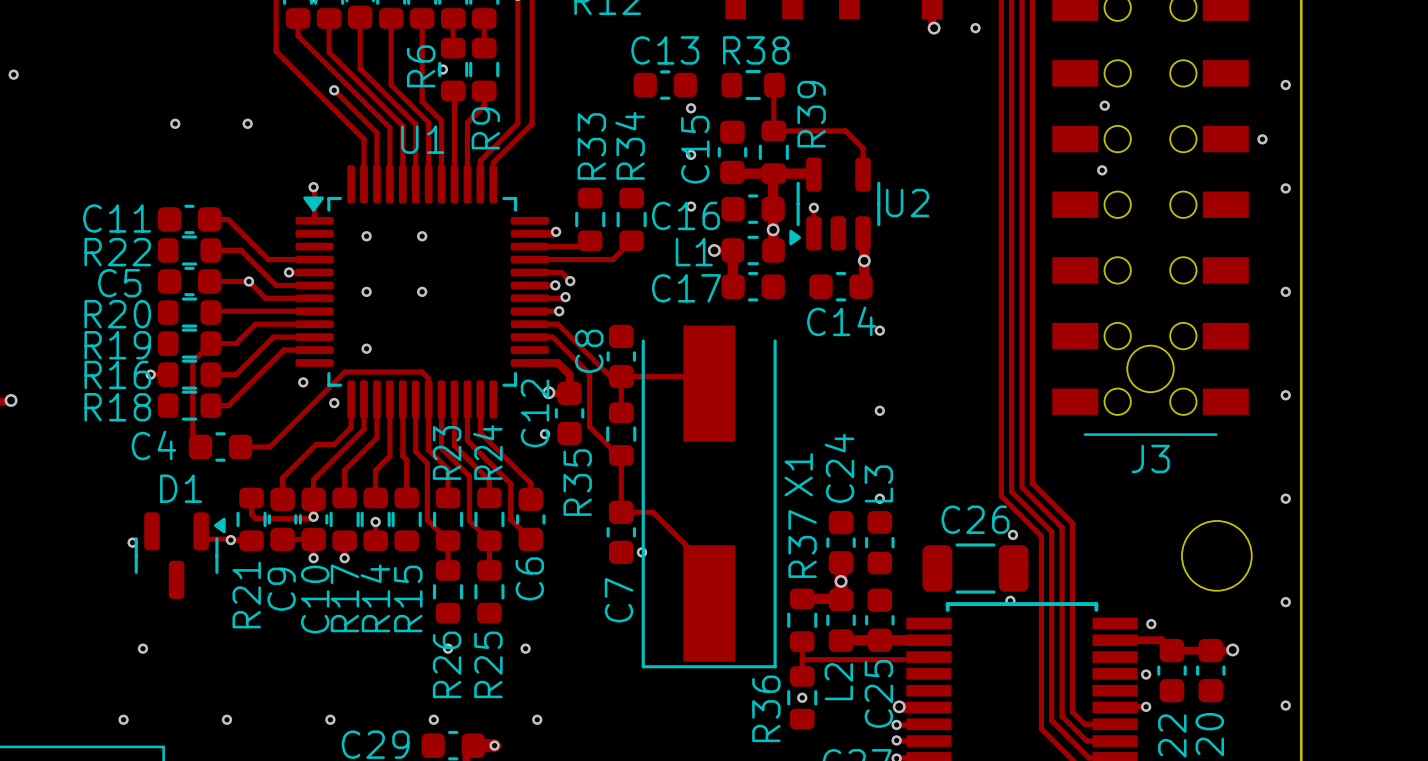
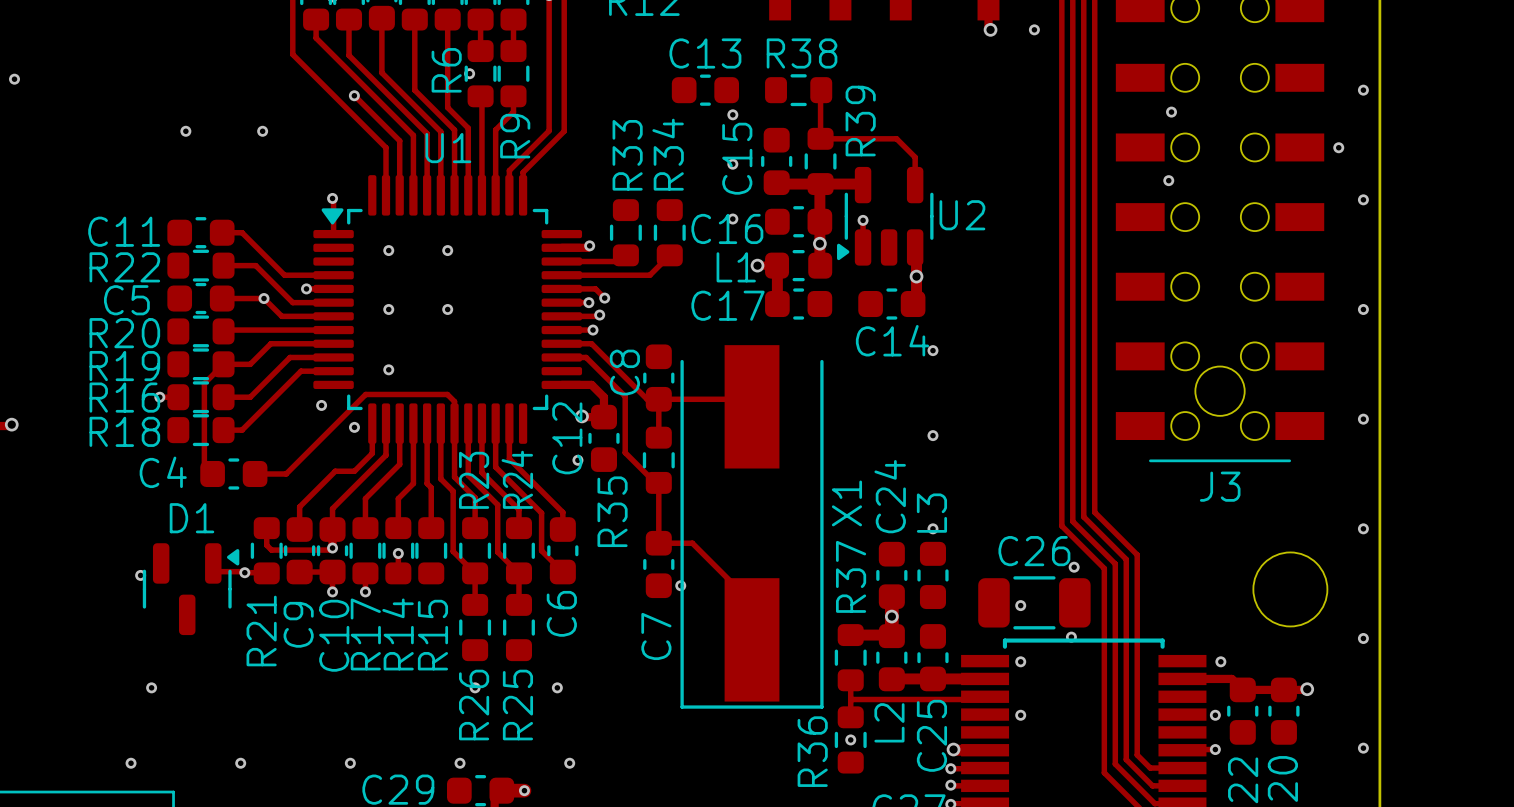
via: none -> (1020, 605)
via: none -> (1020, 661)
via: none -> (1020, 715)

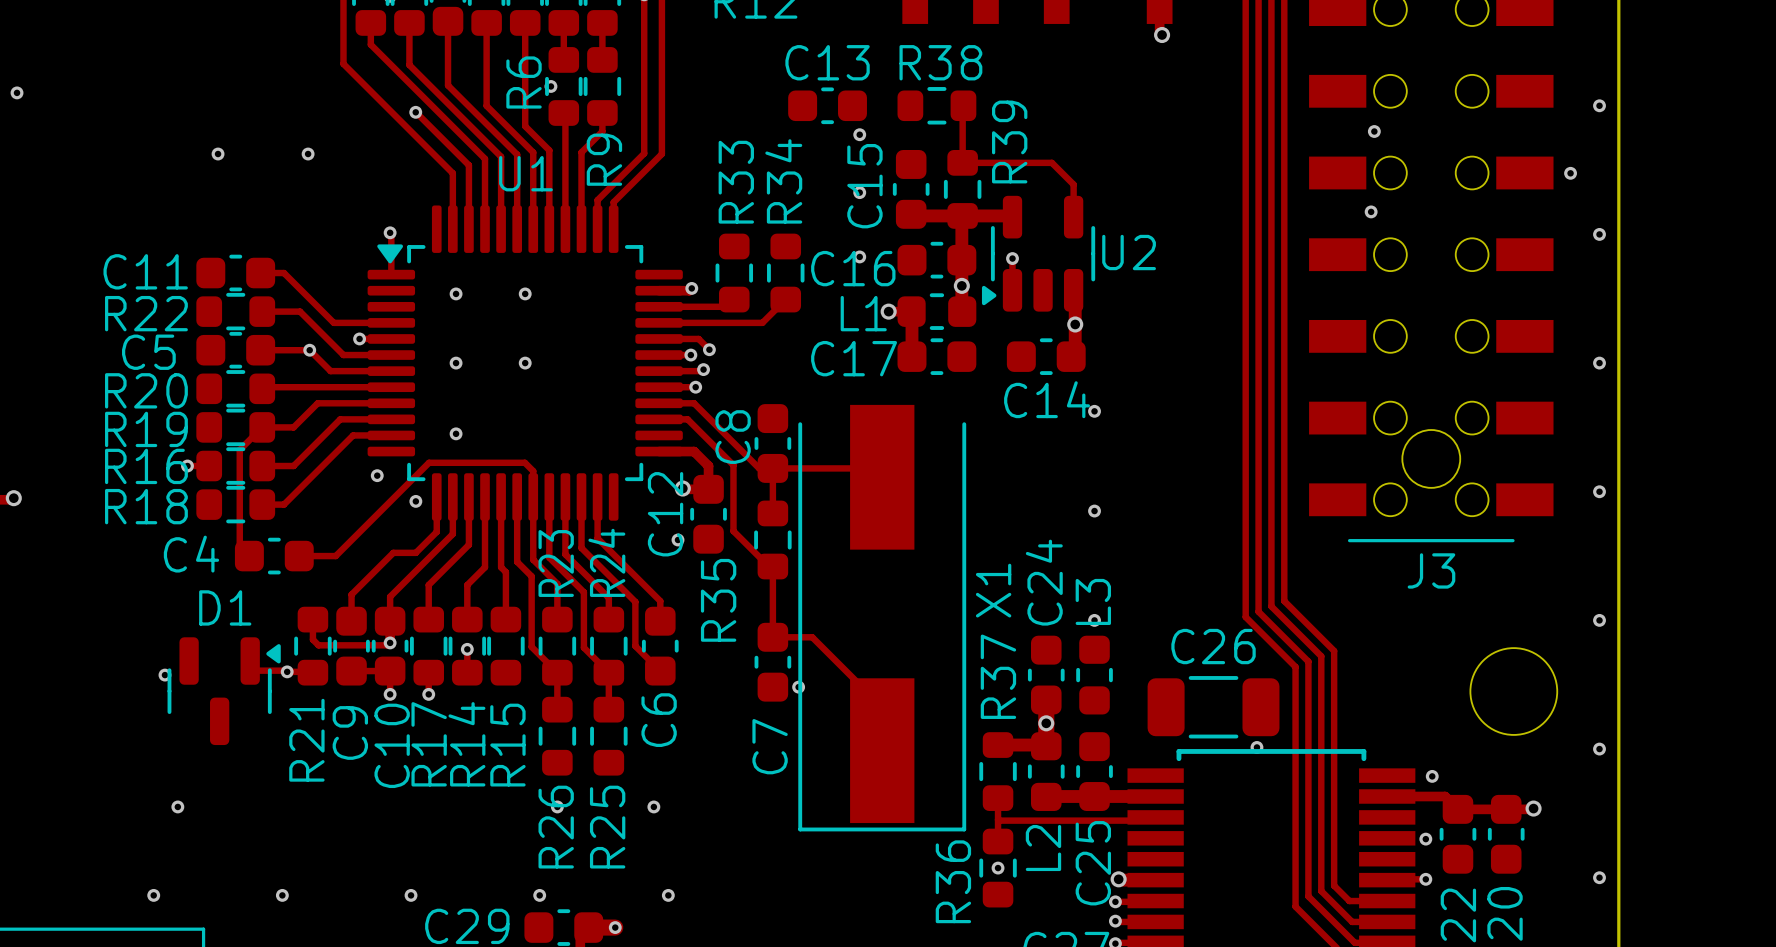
via: (1034, 29) -> none
via: (1074, 567) -> none
via: (1020, 605) -> none
via: (1020, 661) -> none
via: (1020, 715) -> none

